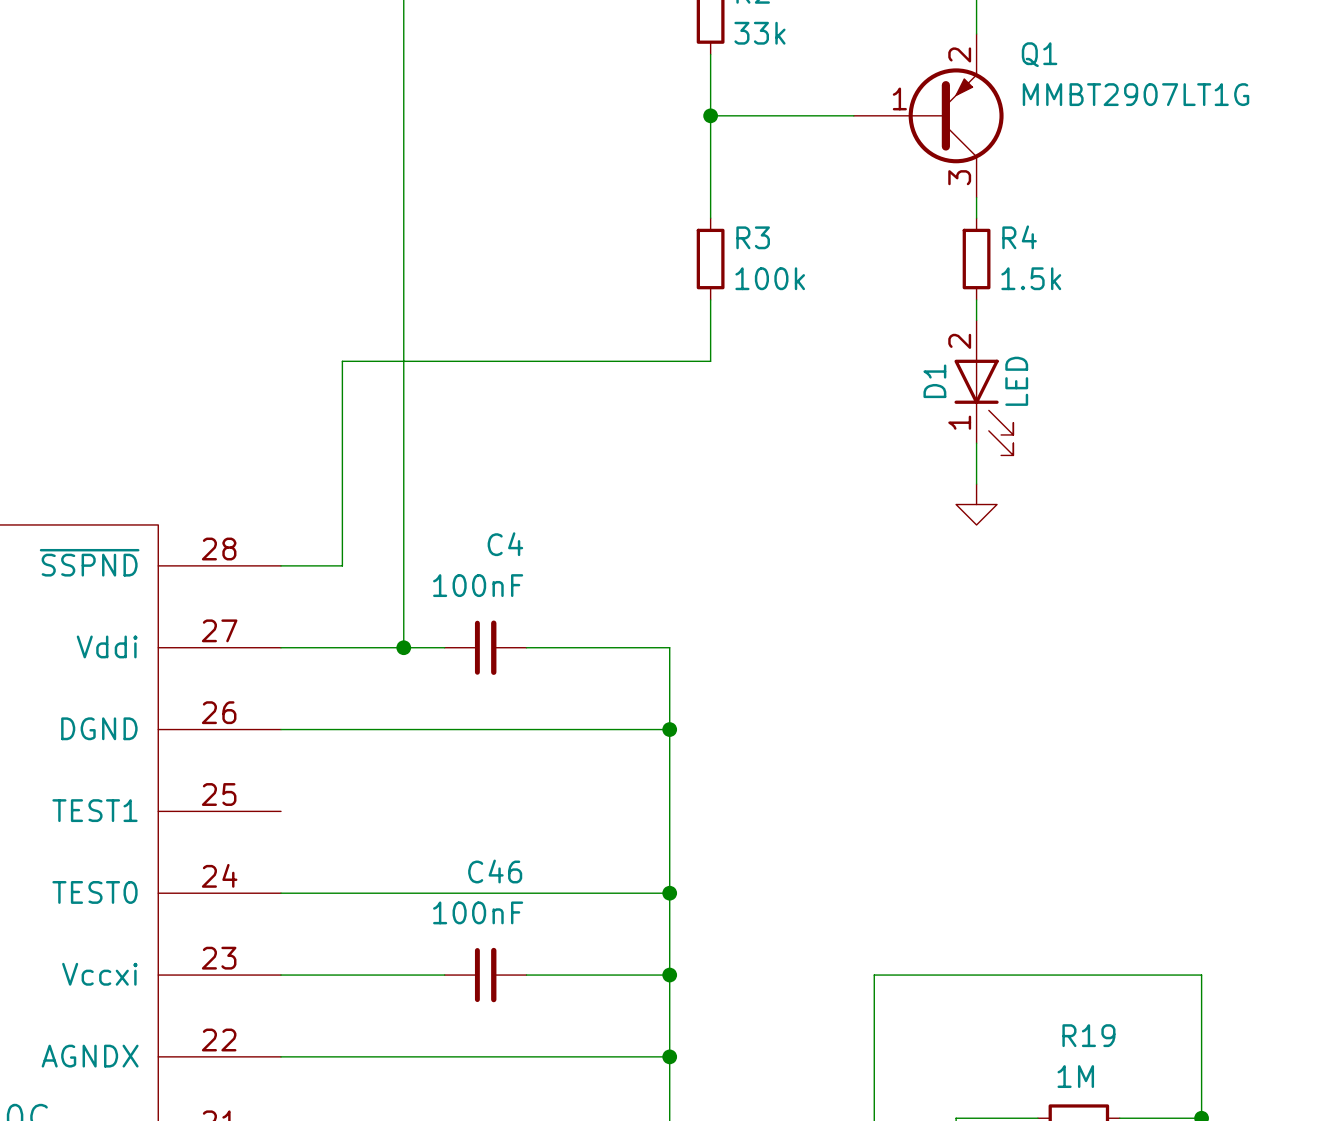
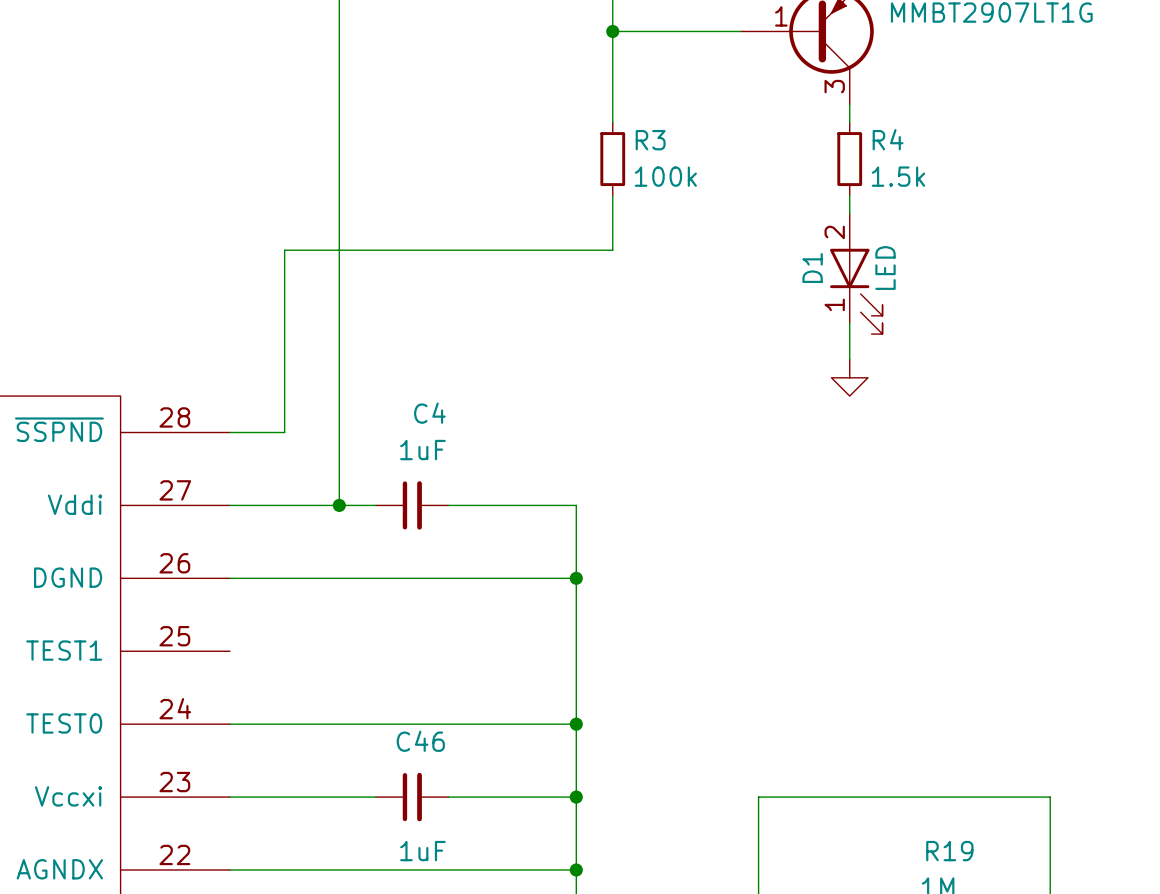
C4 value: 100nF (478, 585) -> 1uF (422, 450)
C46 name position: C46 (495, 871) -> C46 (420, 741)
C46 value: 100nF (478, 912) -> 1uF (422, 851)

